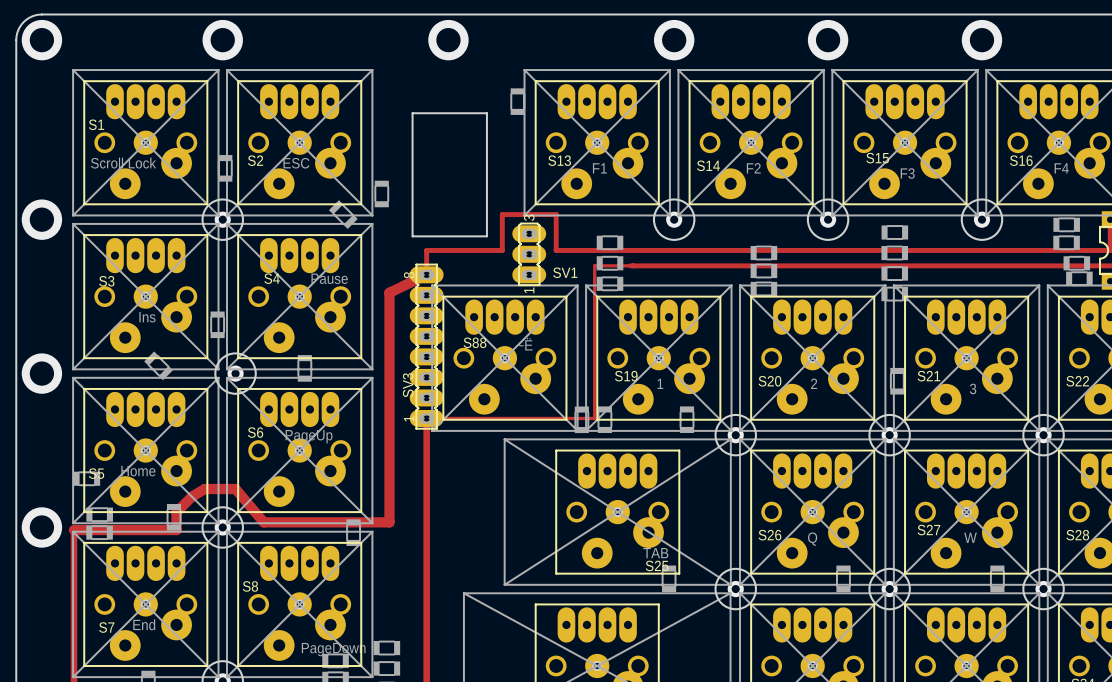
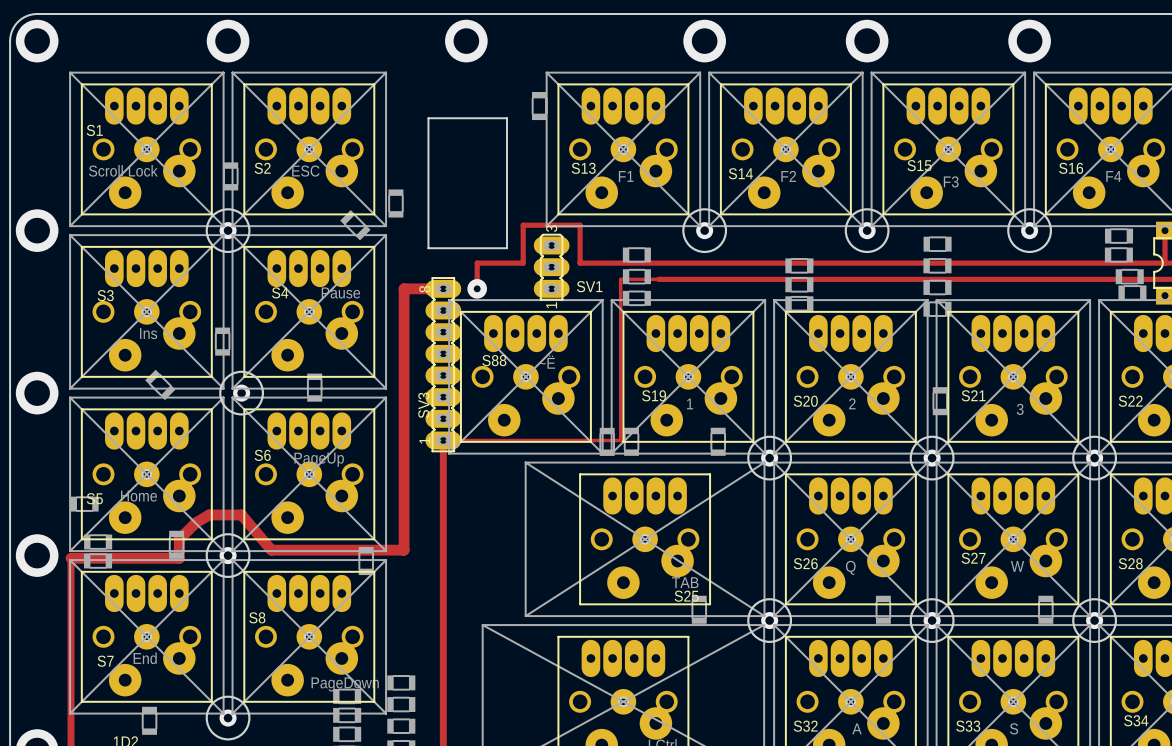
track: (458, 250) (426, 250) (426, 274) (389, 292) -> (443, 288) (404, 288) (404, 307)
track: none -> (477, 263) (477, 288)
via: none -> (477, 288)

